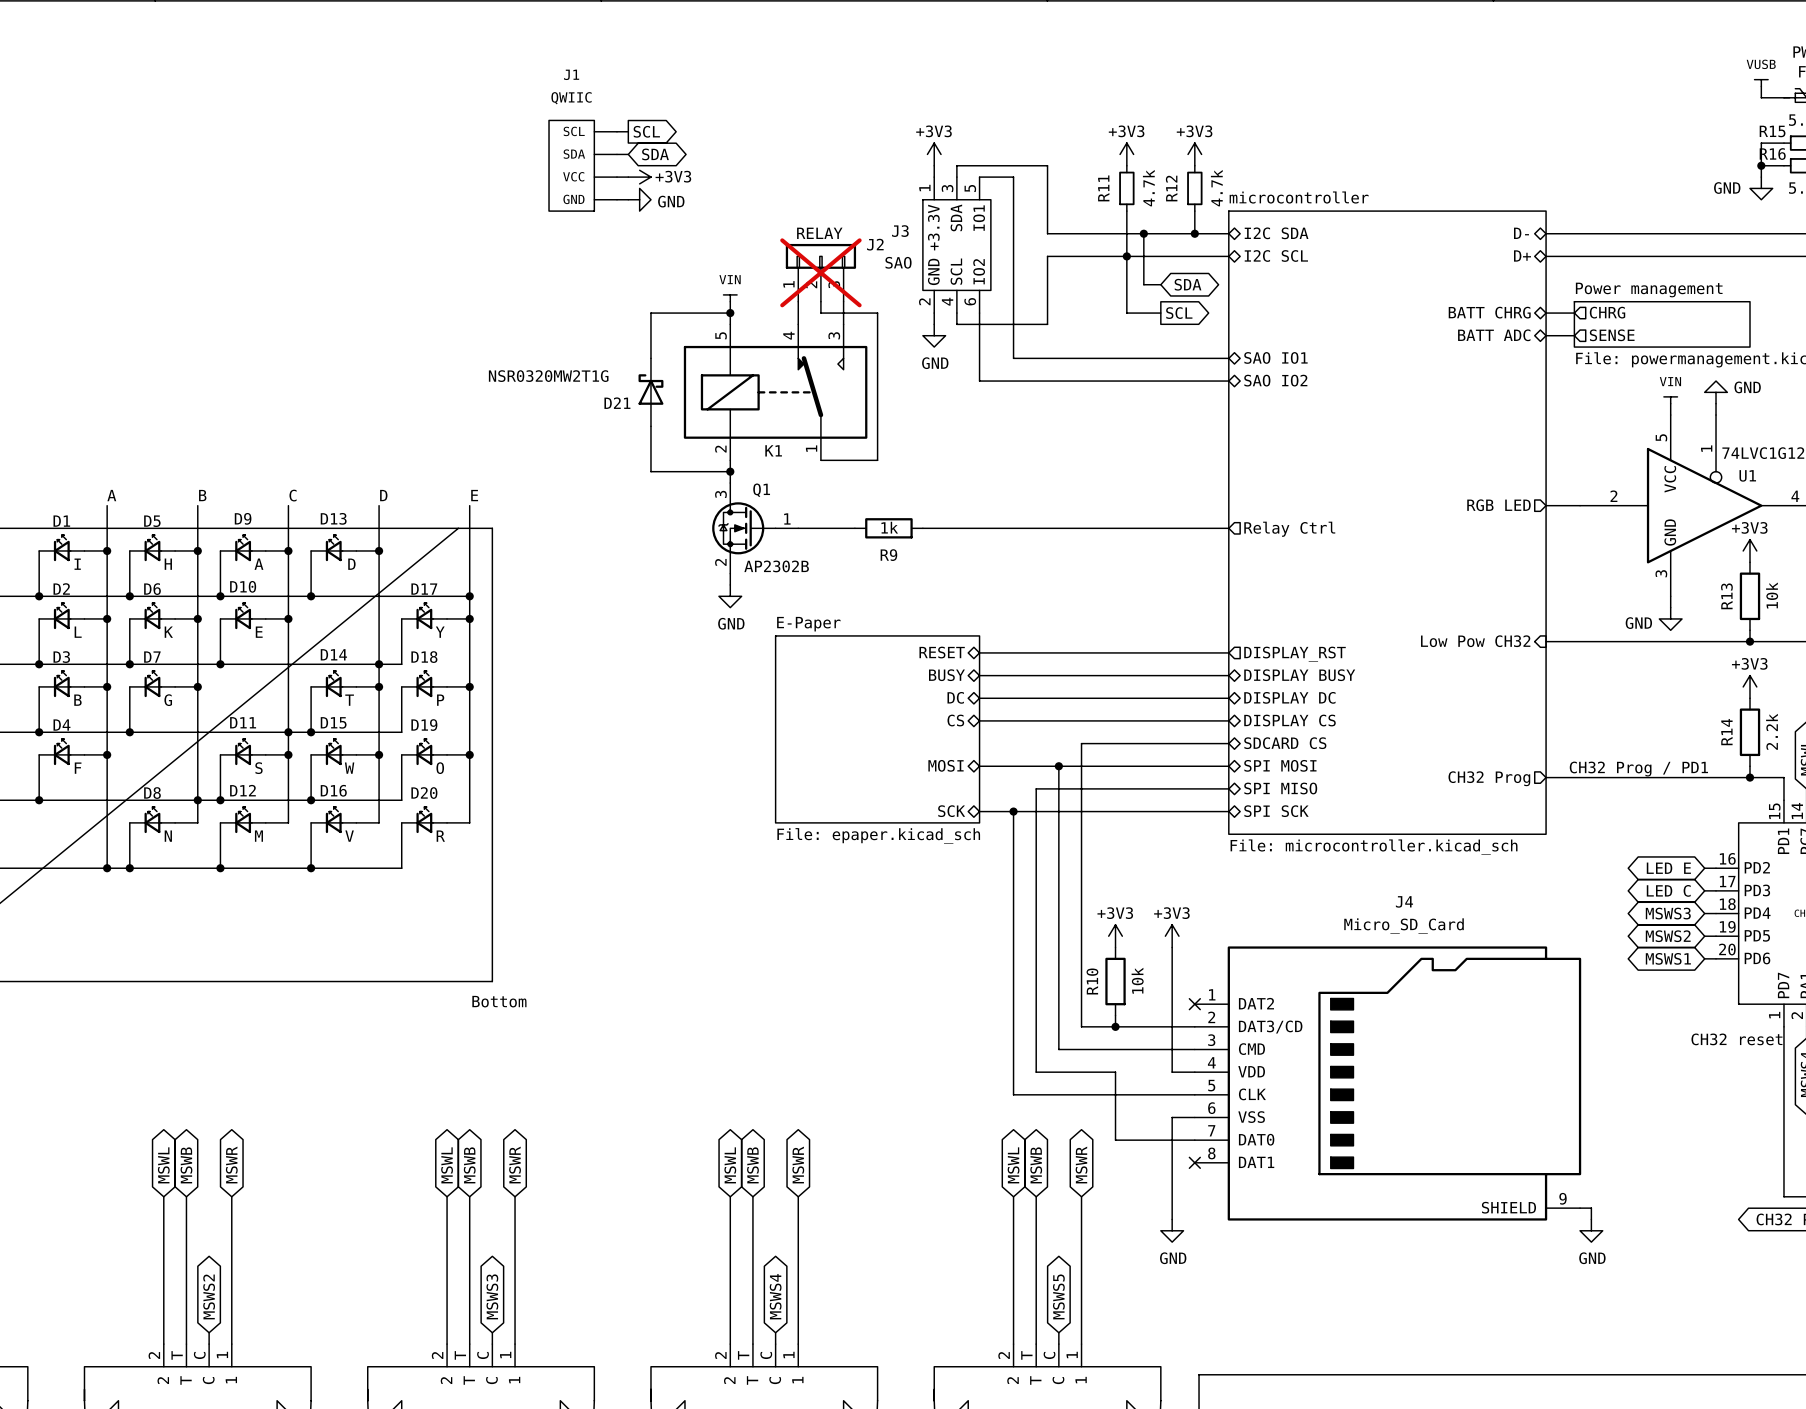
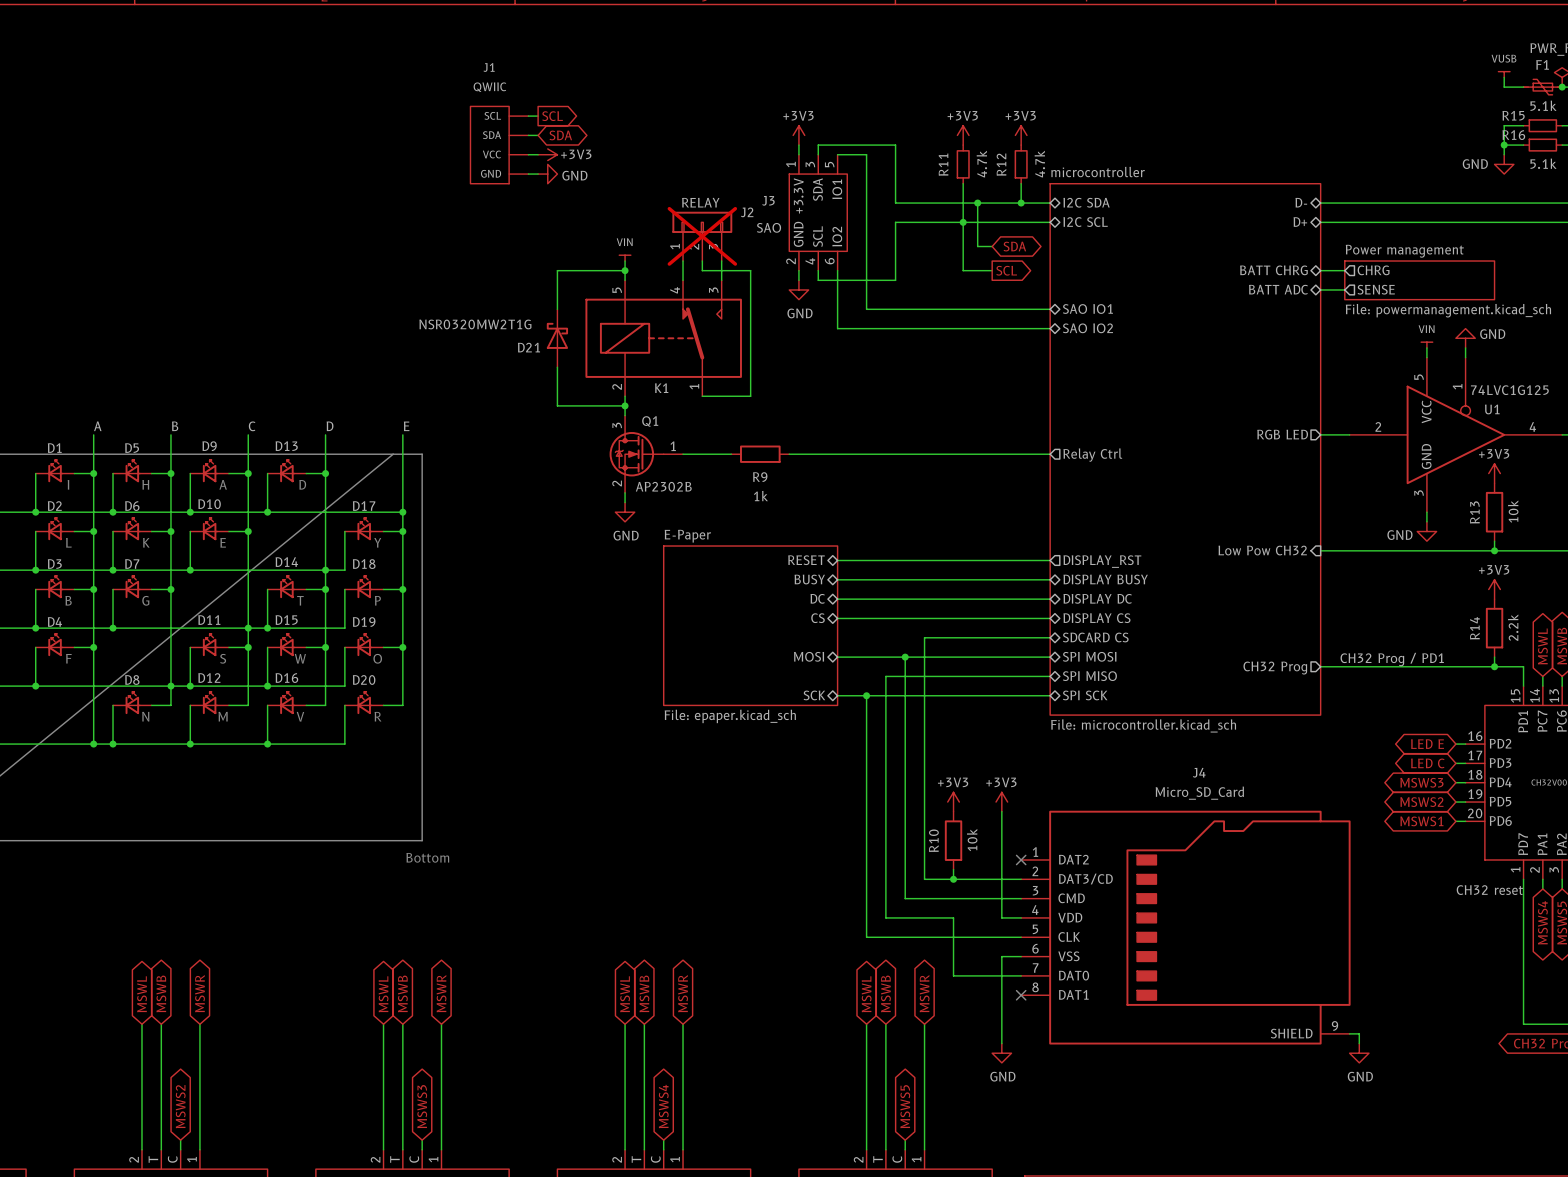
R9 value position: 1k (889, 527) -> 1k (760, 496)

